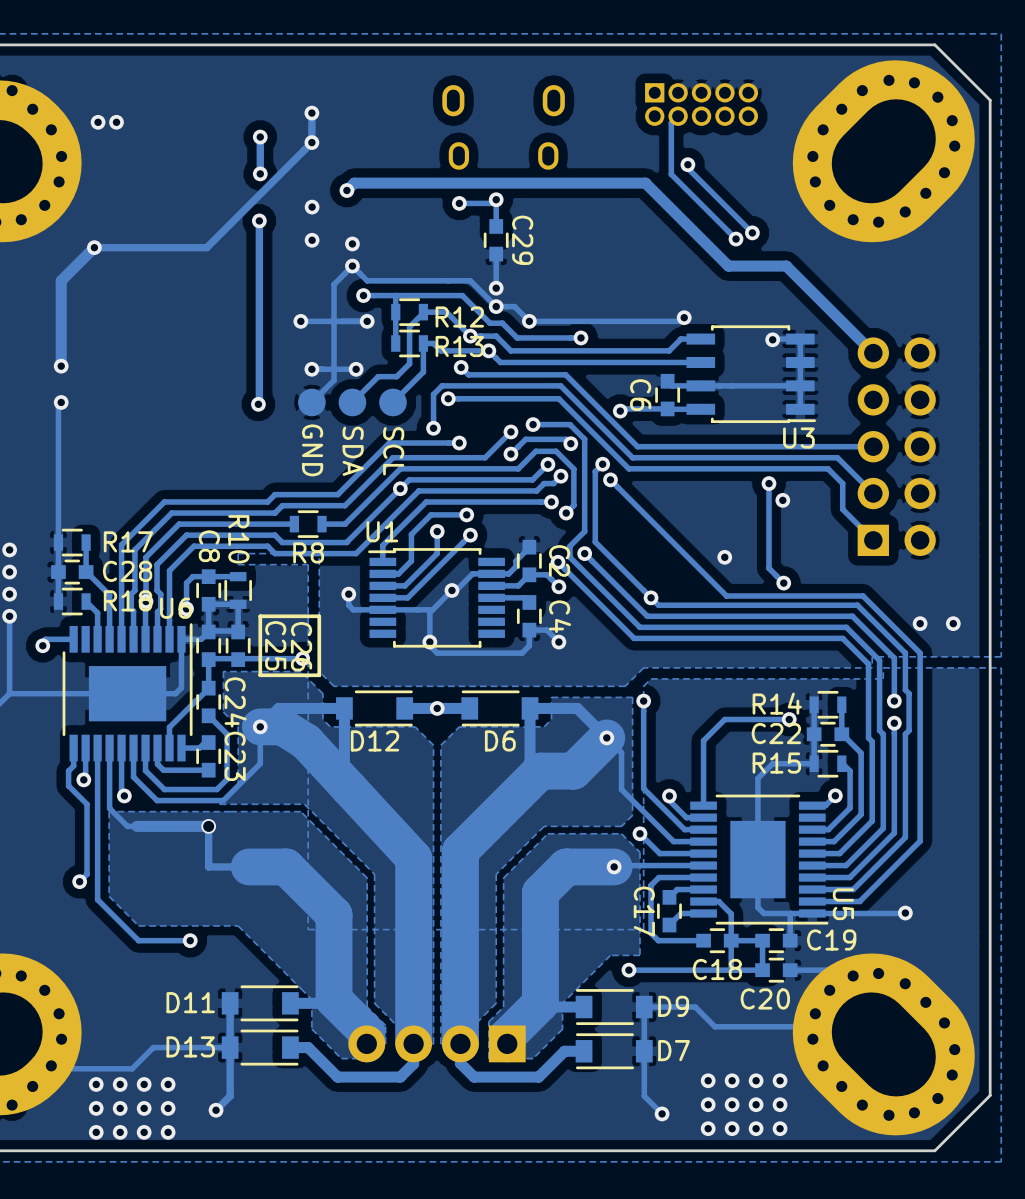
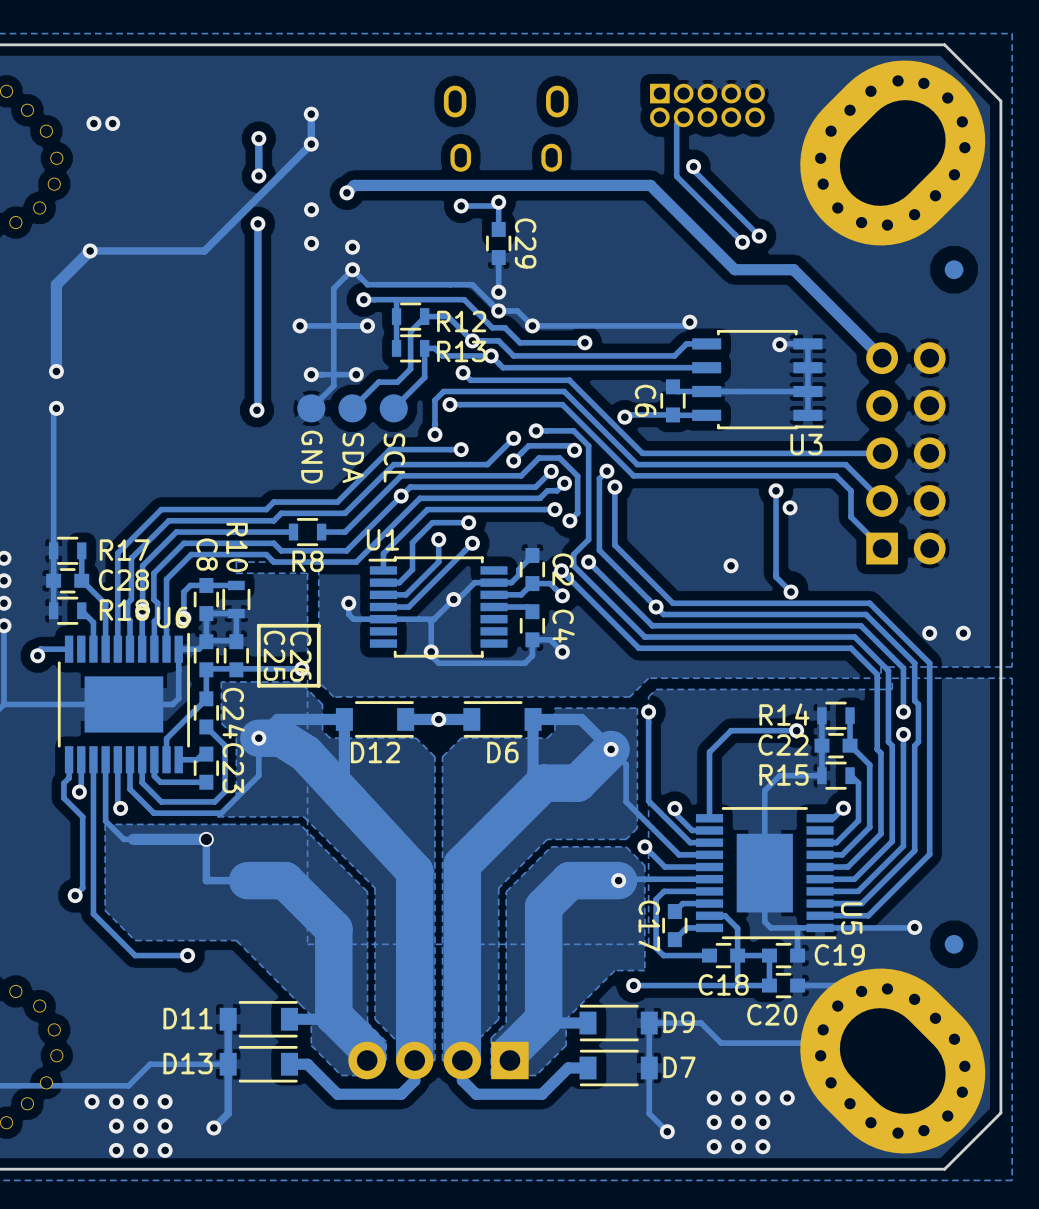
part: none -> (954, 269)
track: (610, 479) (726, 596) (863, 596) -> (614, 487) (614, 545) (672, 603) (869, 603) (871, 605)
part: none -> (954, 944)
via: (780, 1104) -> none
via: (96, 1108) -> none
via: (780, 1128) -> none
via: (96, 1132) -> none

